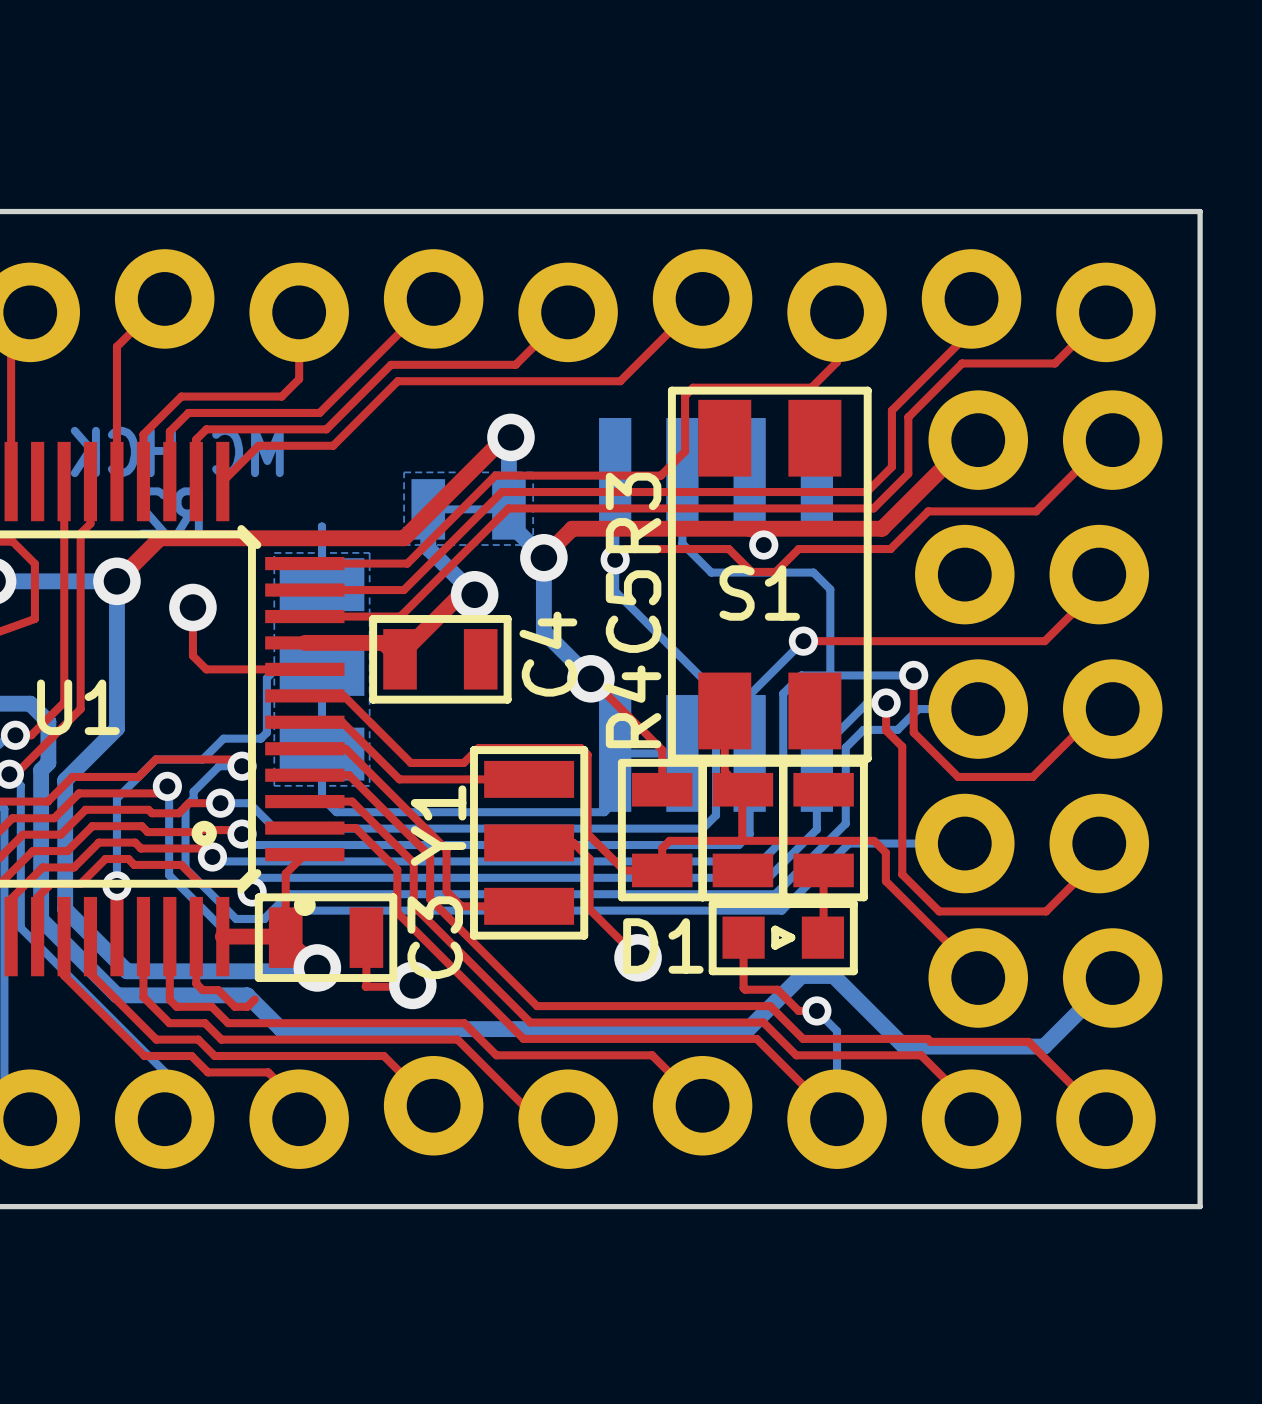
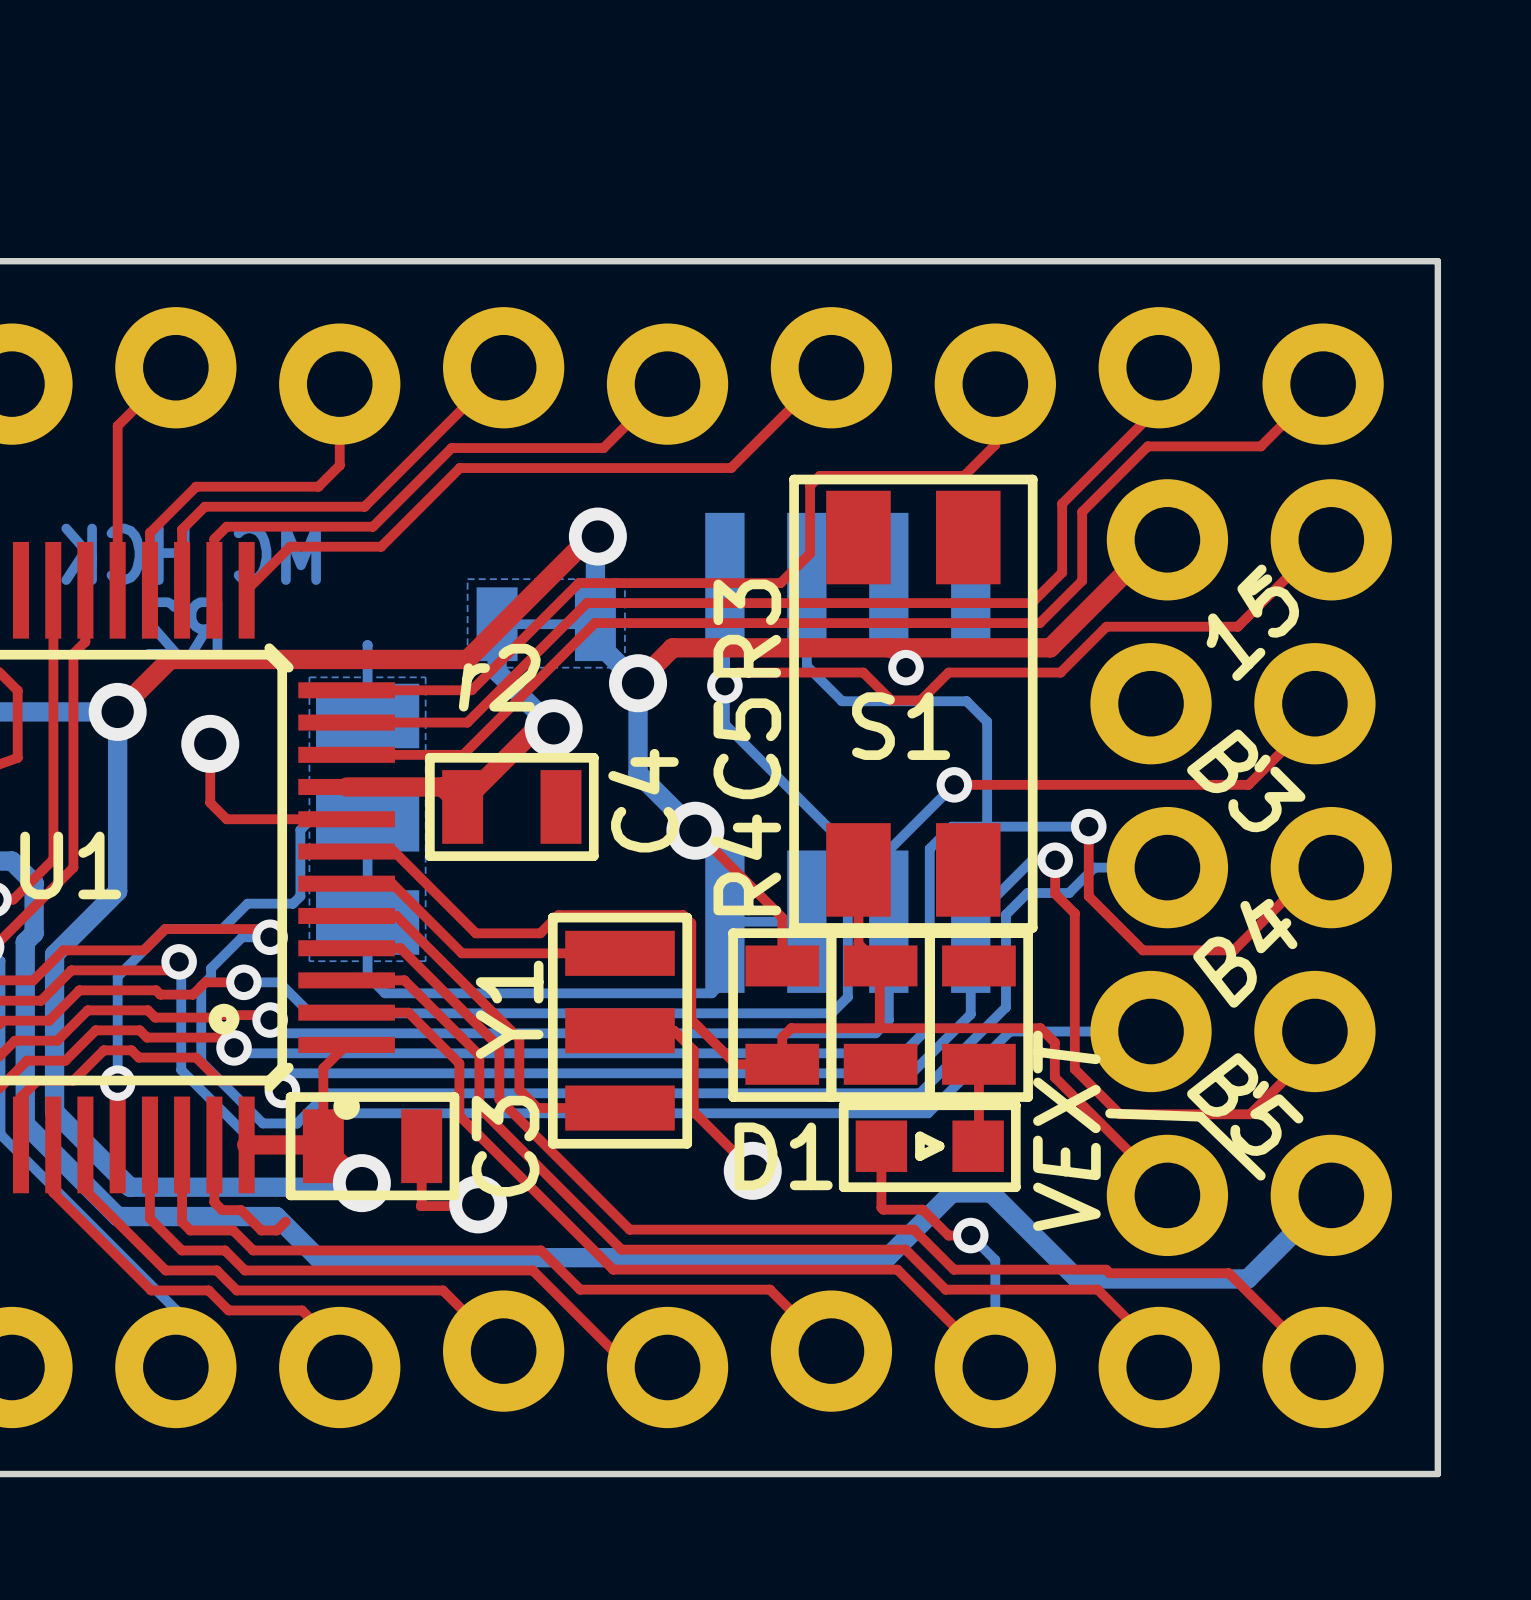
text: none -> r2 (499, 677)
part: none -> (1248, 867)

